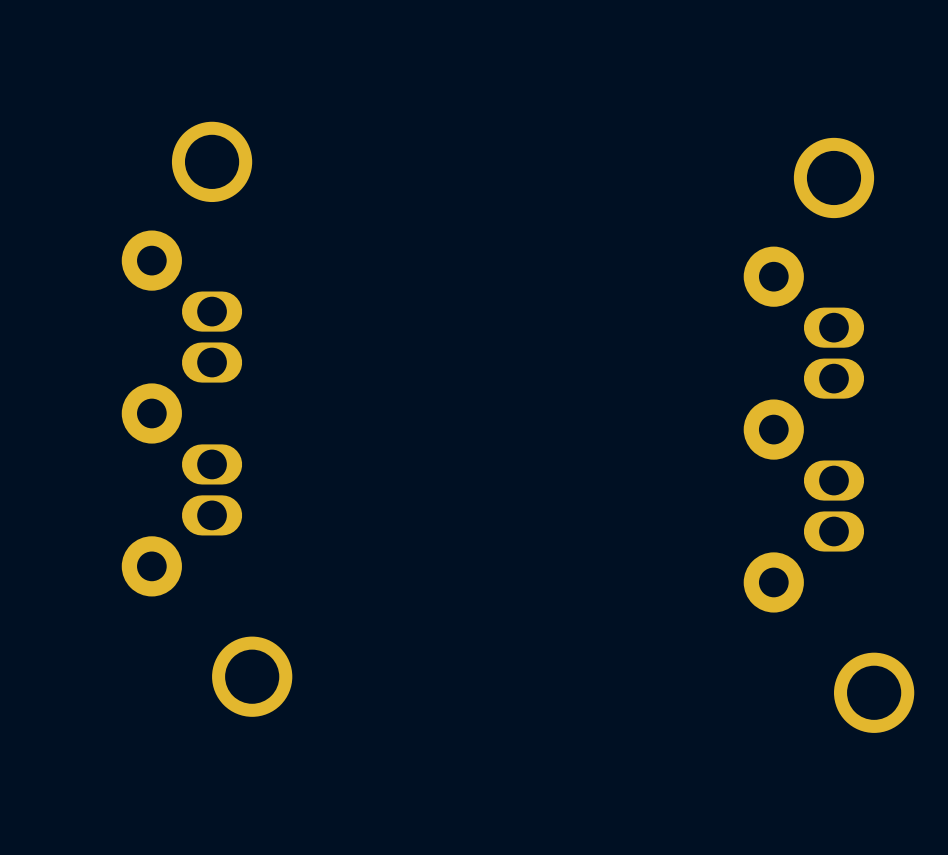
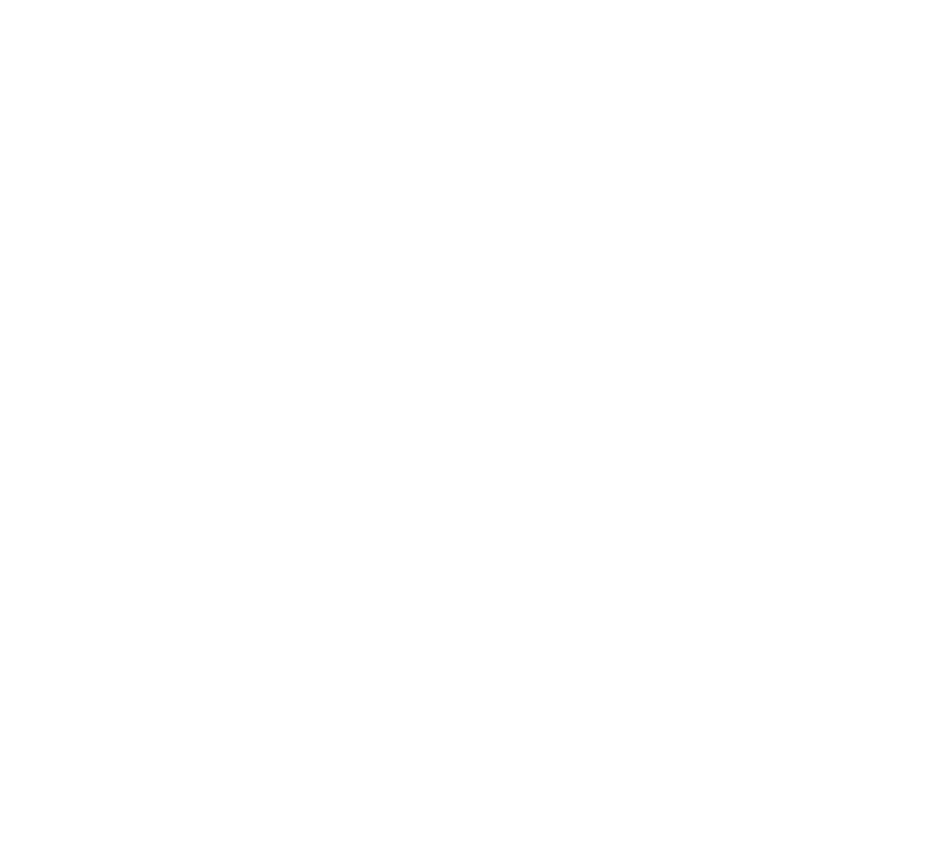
part: (207, 419) -> none
part: (828, 435) -> none

